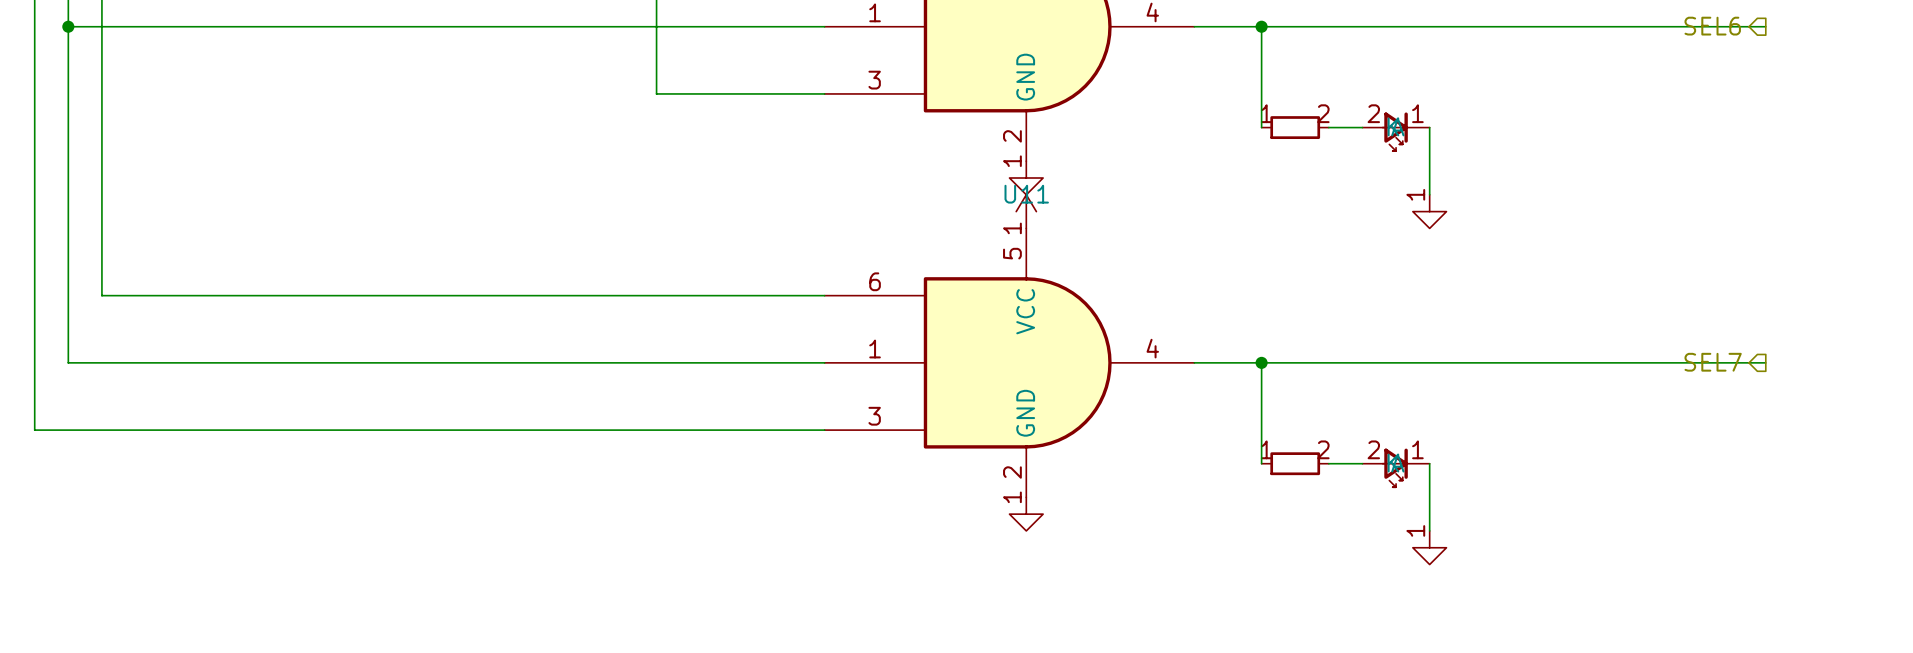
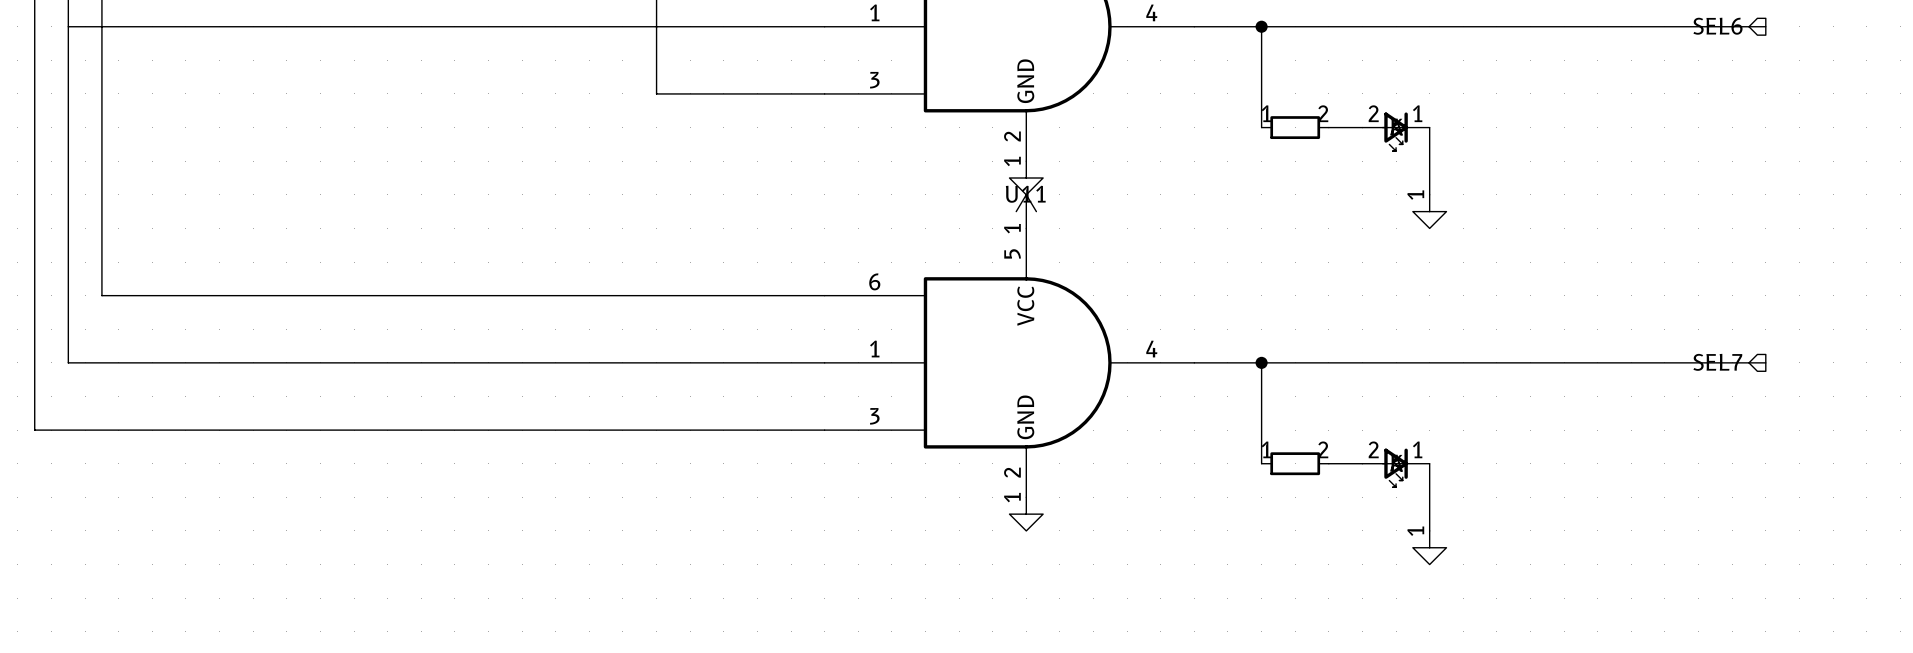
junction: (68, 26) -> none

